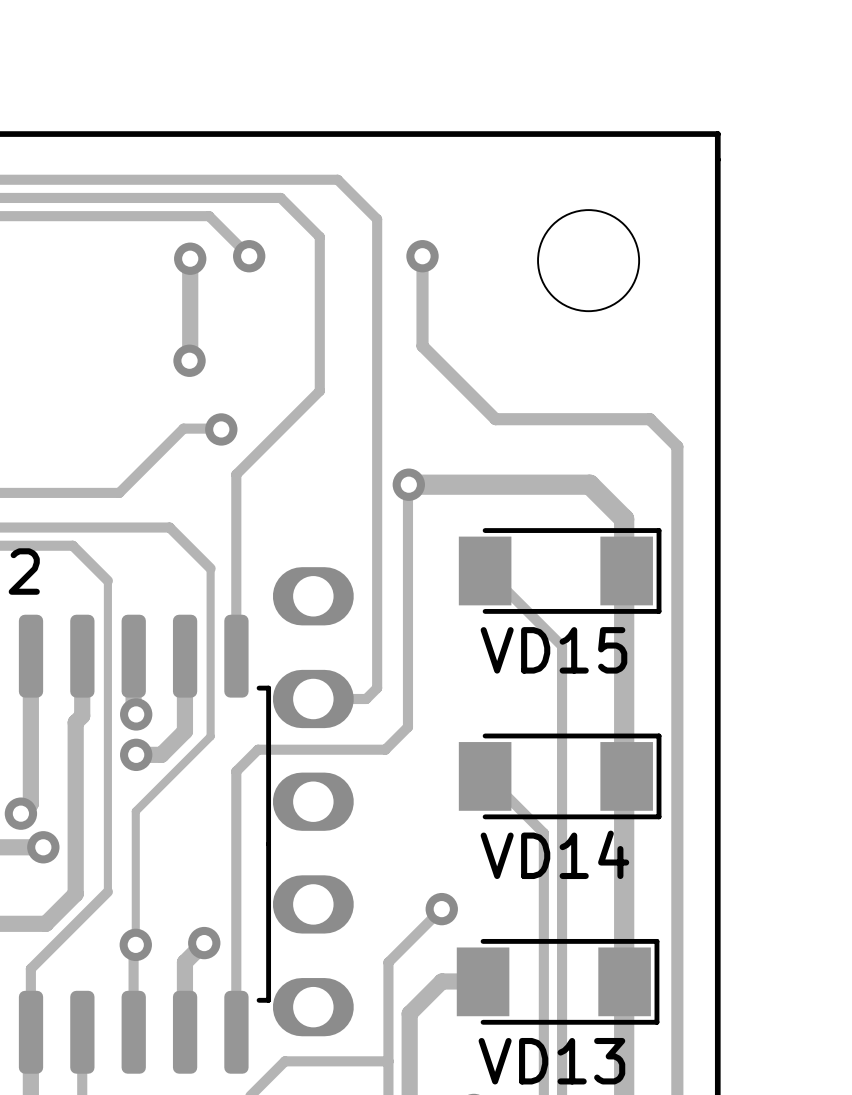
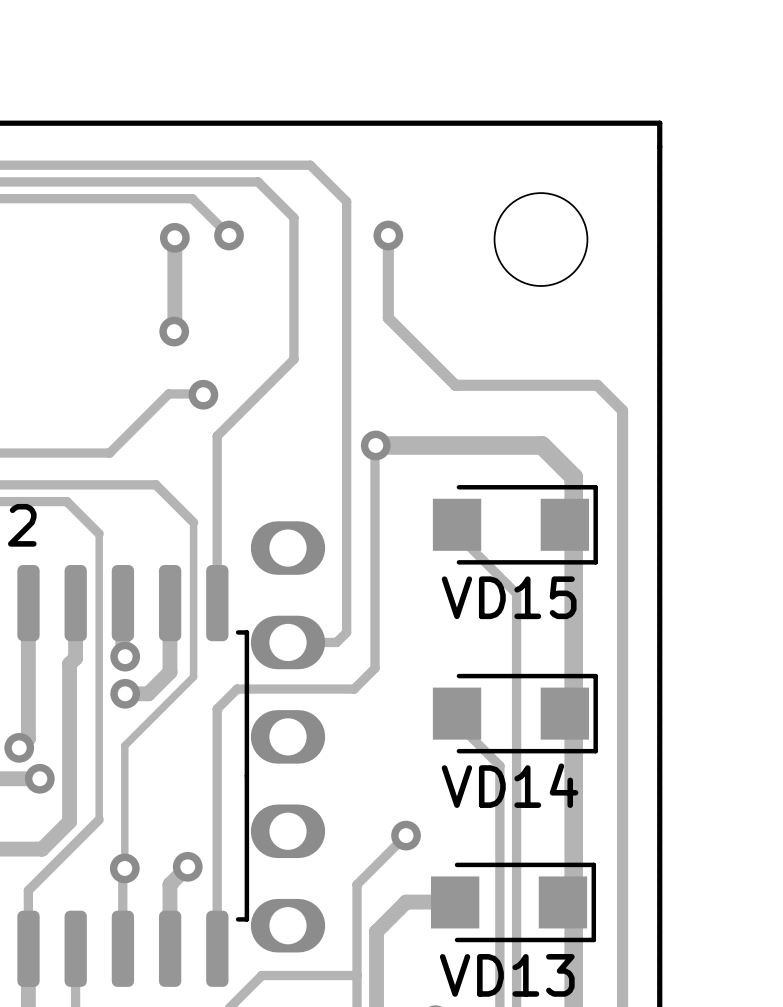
VD15 footprint: [458, 528, 662, 614] -> [432, 485, 598, 565]
VD14 footprint: [458, 733, 662, 820] -> [432, 673, 598, 754]
VD13 footprint: [456, 938, 660, 1025] -> [430, 862, 597, 943]

